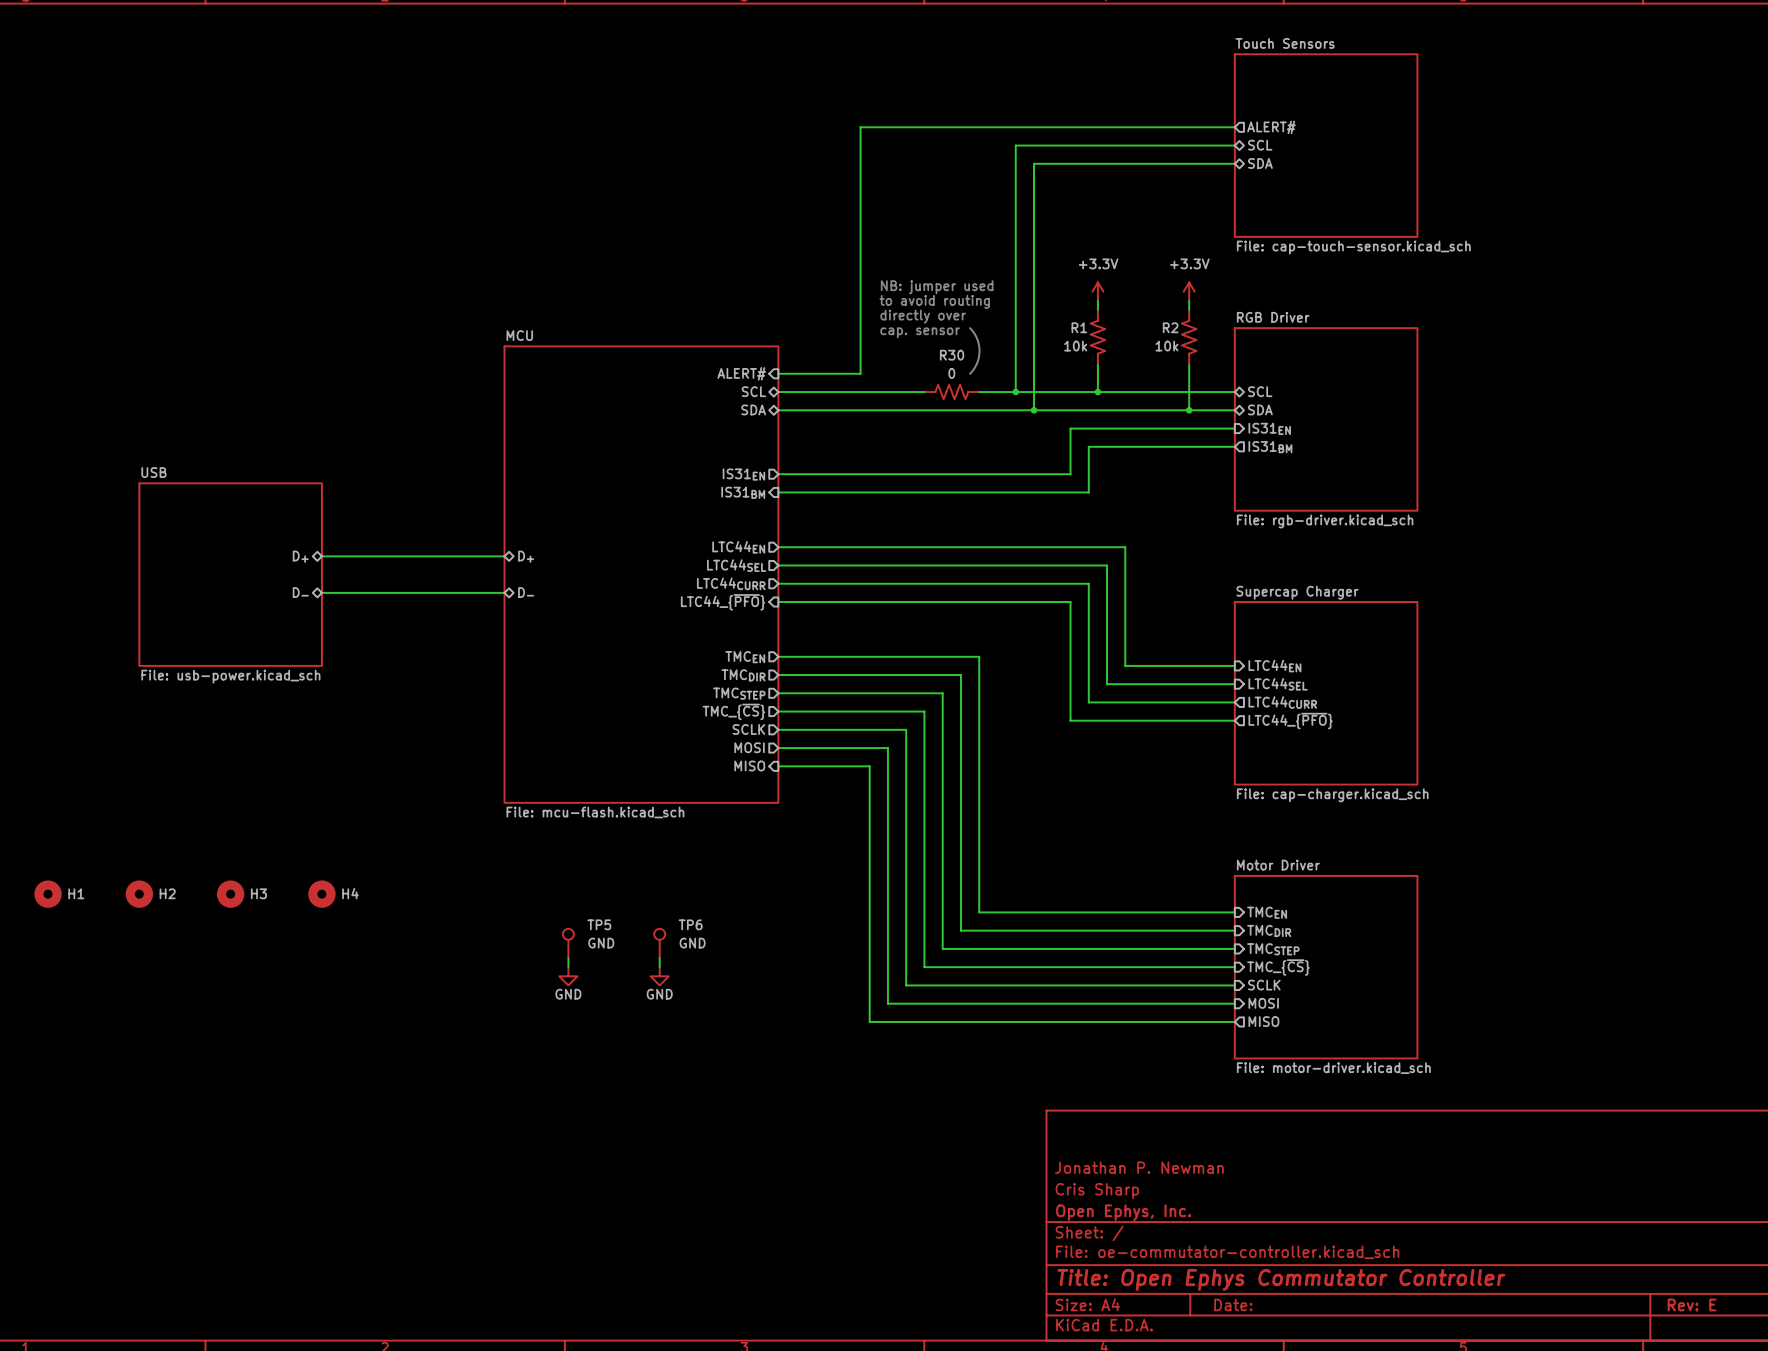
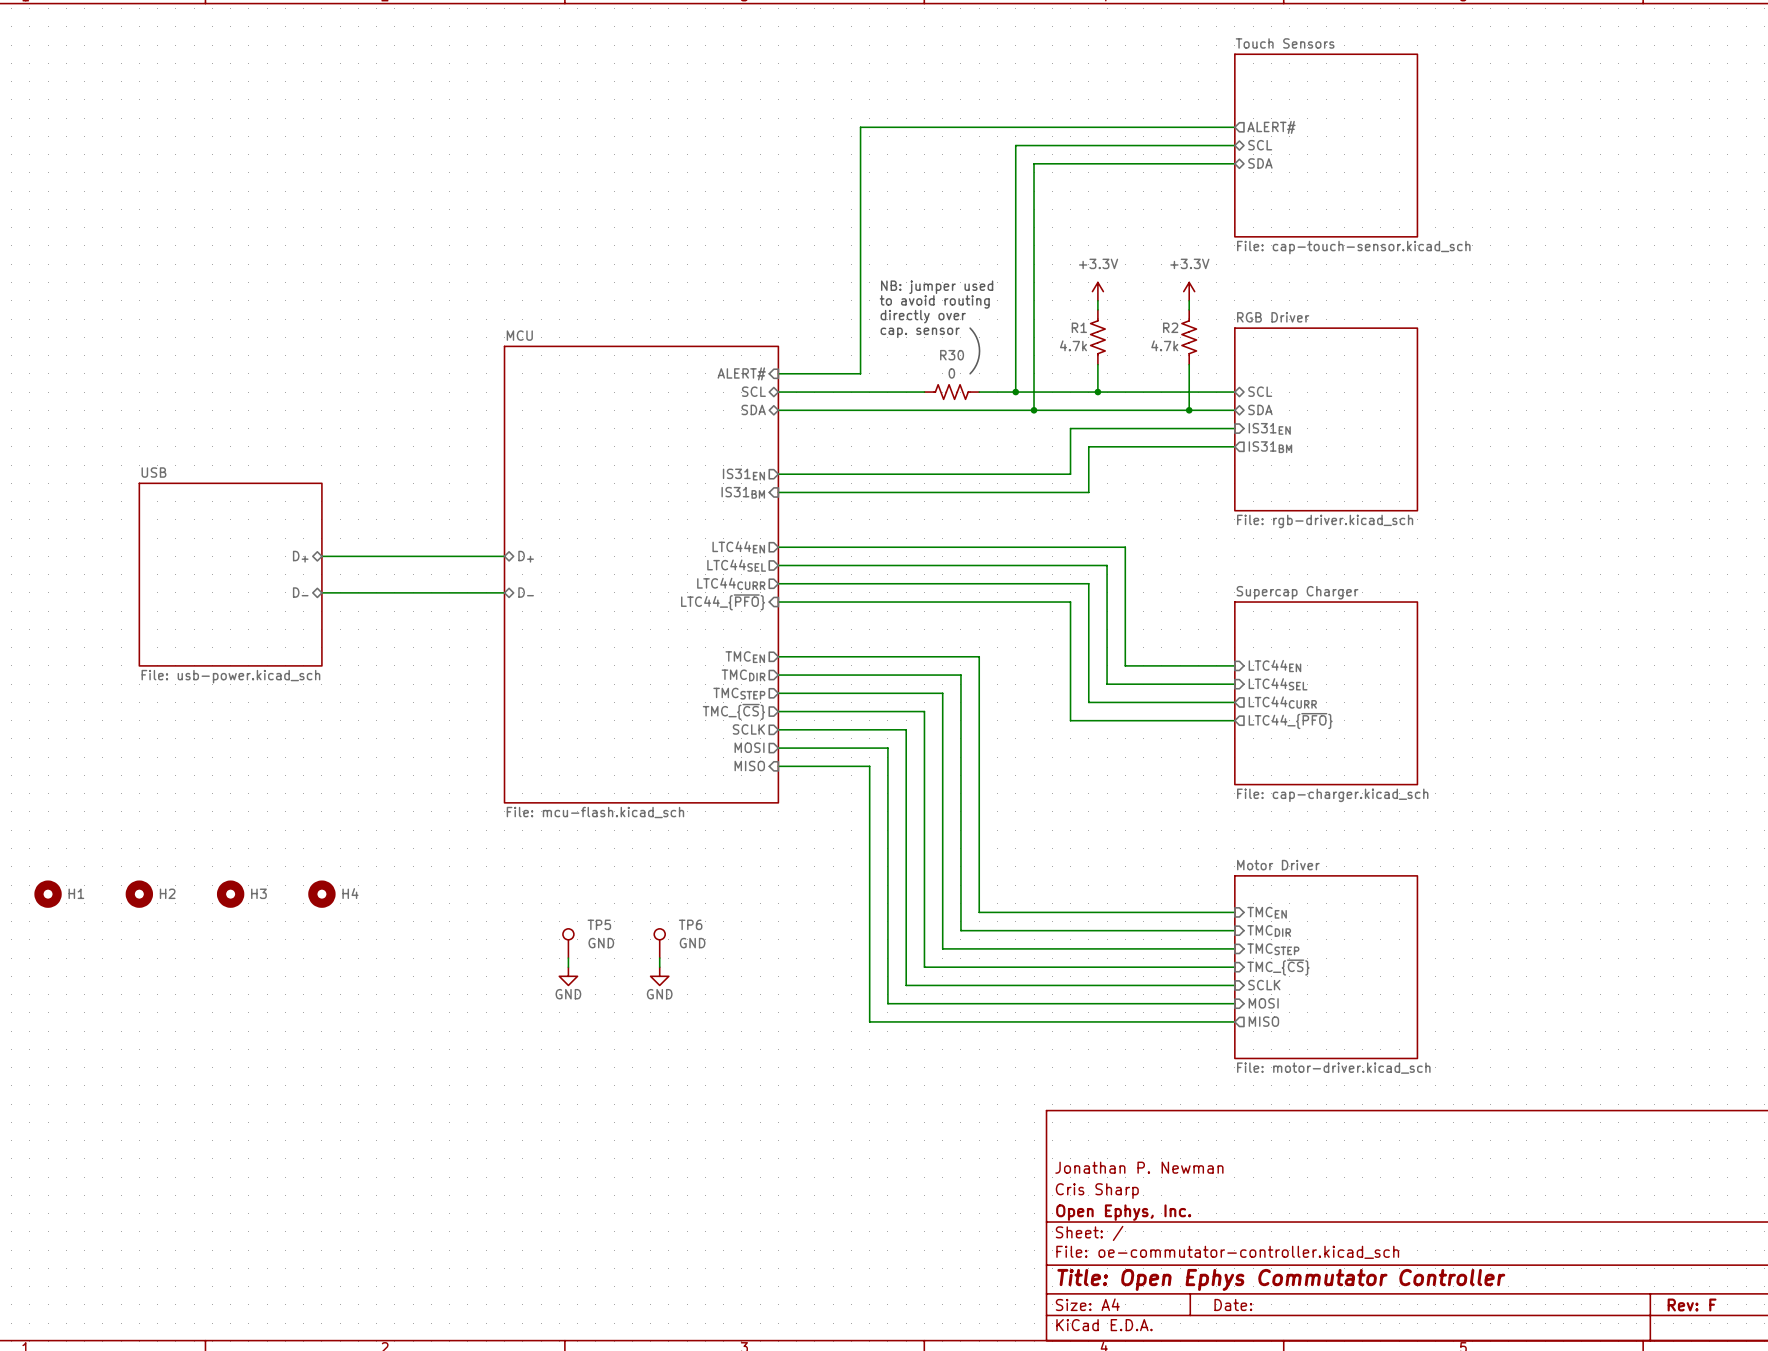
R1 value: 10k (1075, 346) -> 4.7k (1073, 345)
R2 value: 10k (1166, 346) -> 4.7k (1164, 345)
title block: Rev: E (1692, 1304) -> Rev: F (1692, 1304)

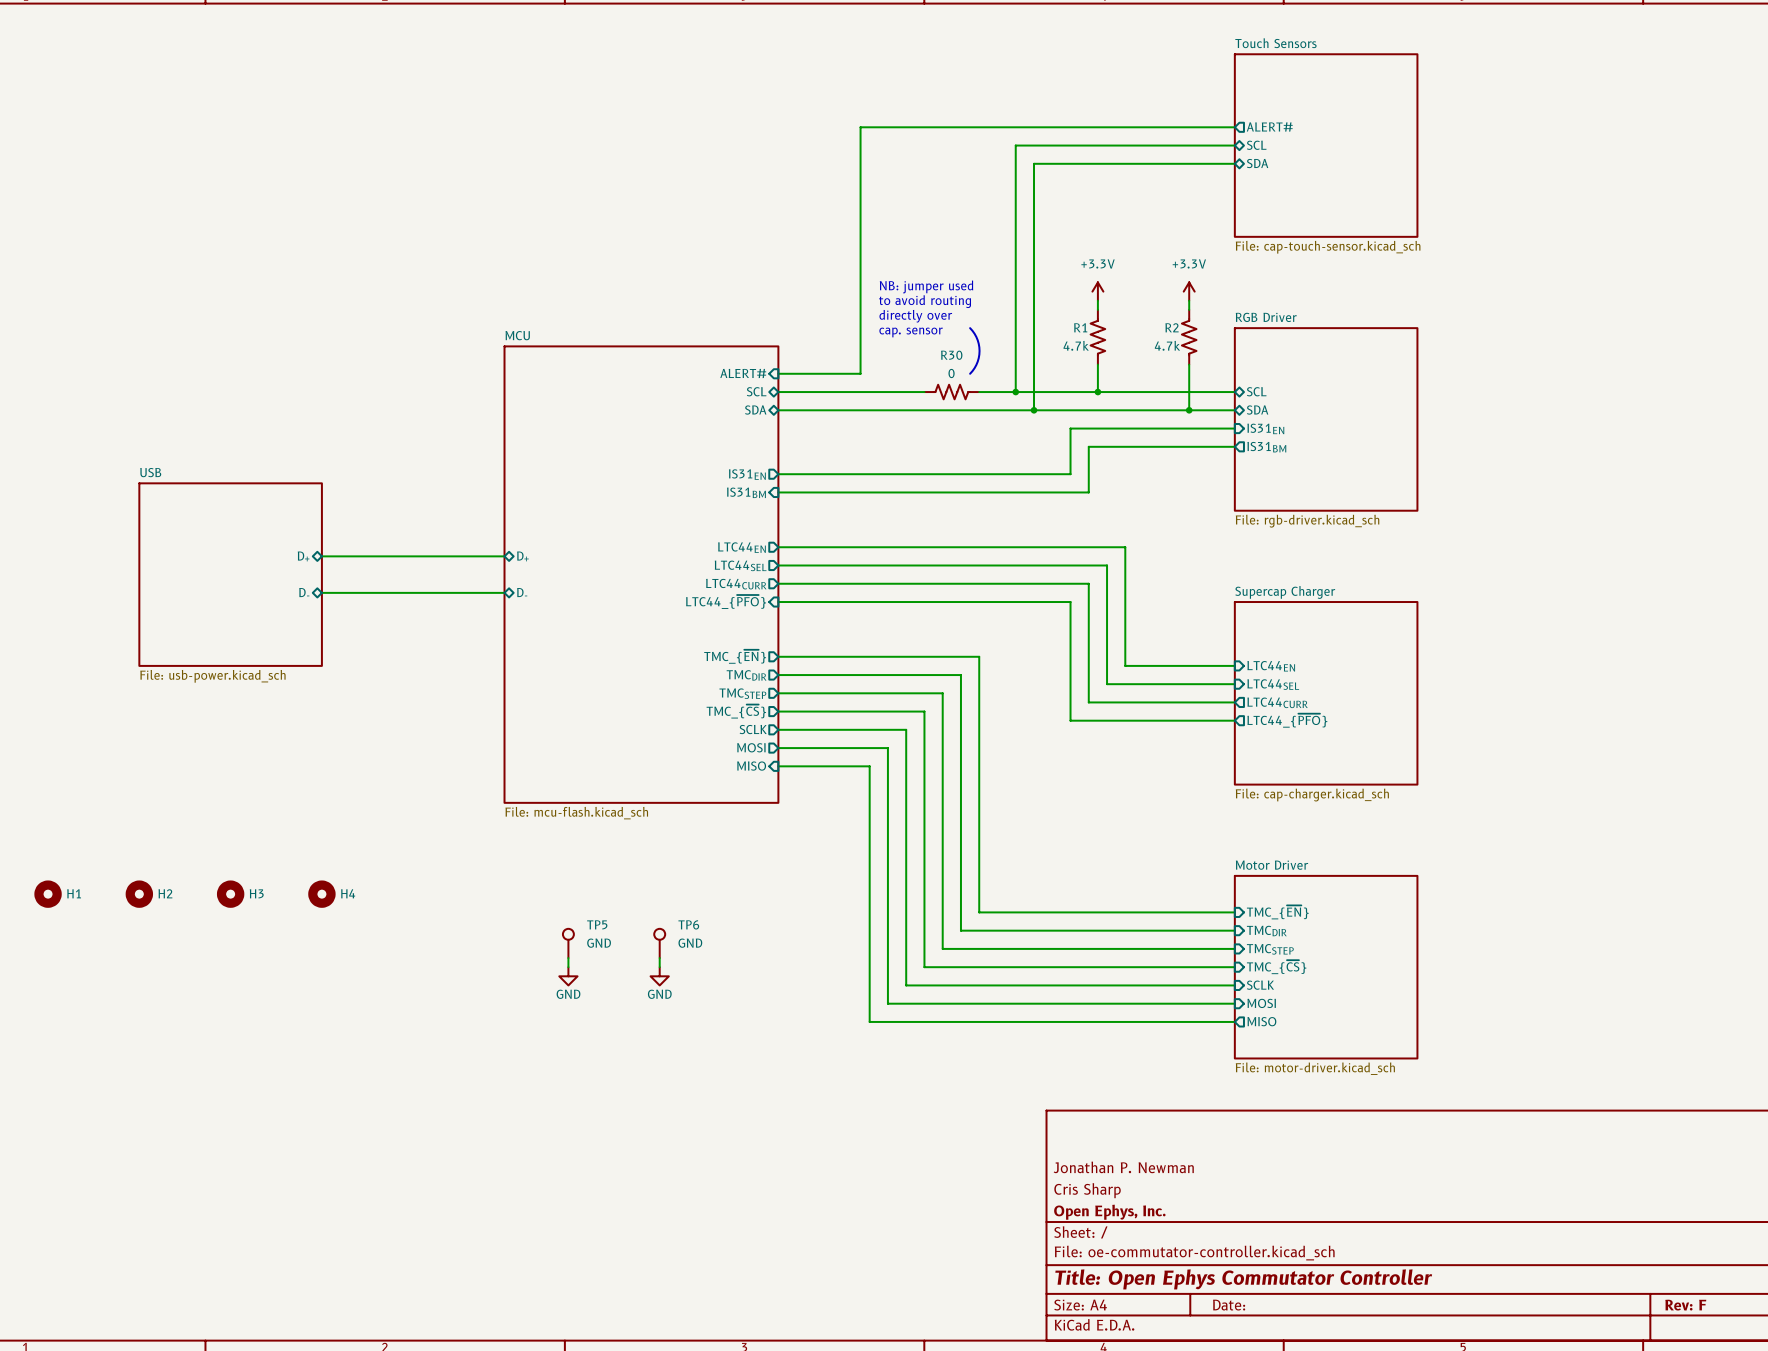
sheet pin: TMCEN (745, 657) -> TMC_{~{EN}} (735, 656)
sheet pin: TMCEN (1267, 912) -> TMC_{~{EN}} (1277, 912)

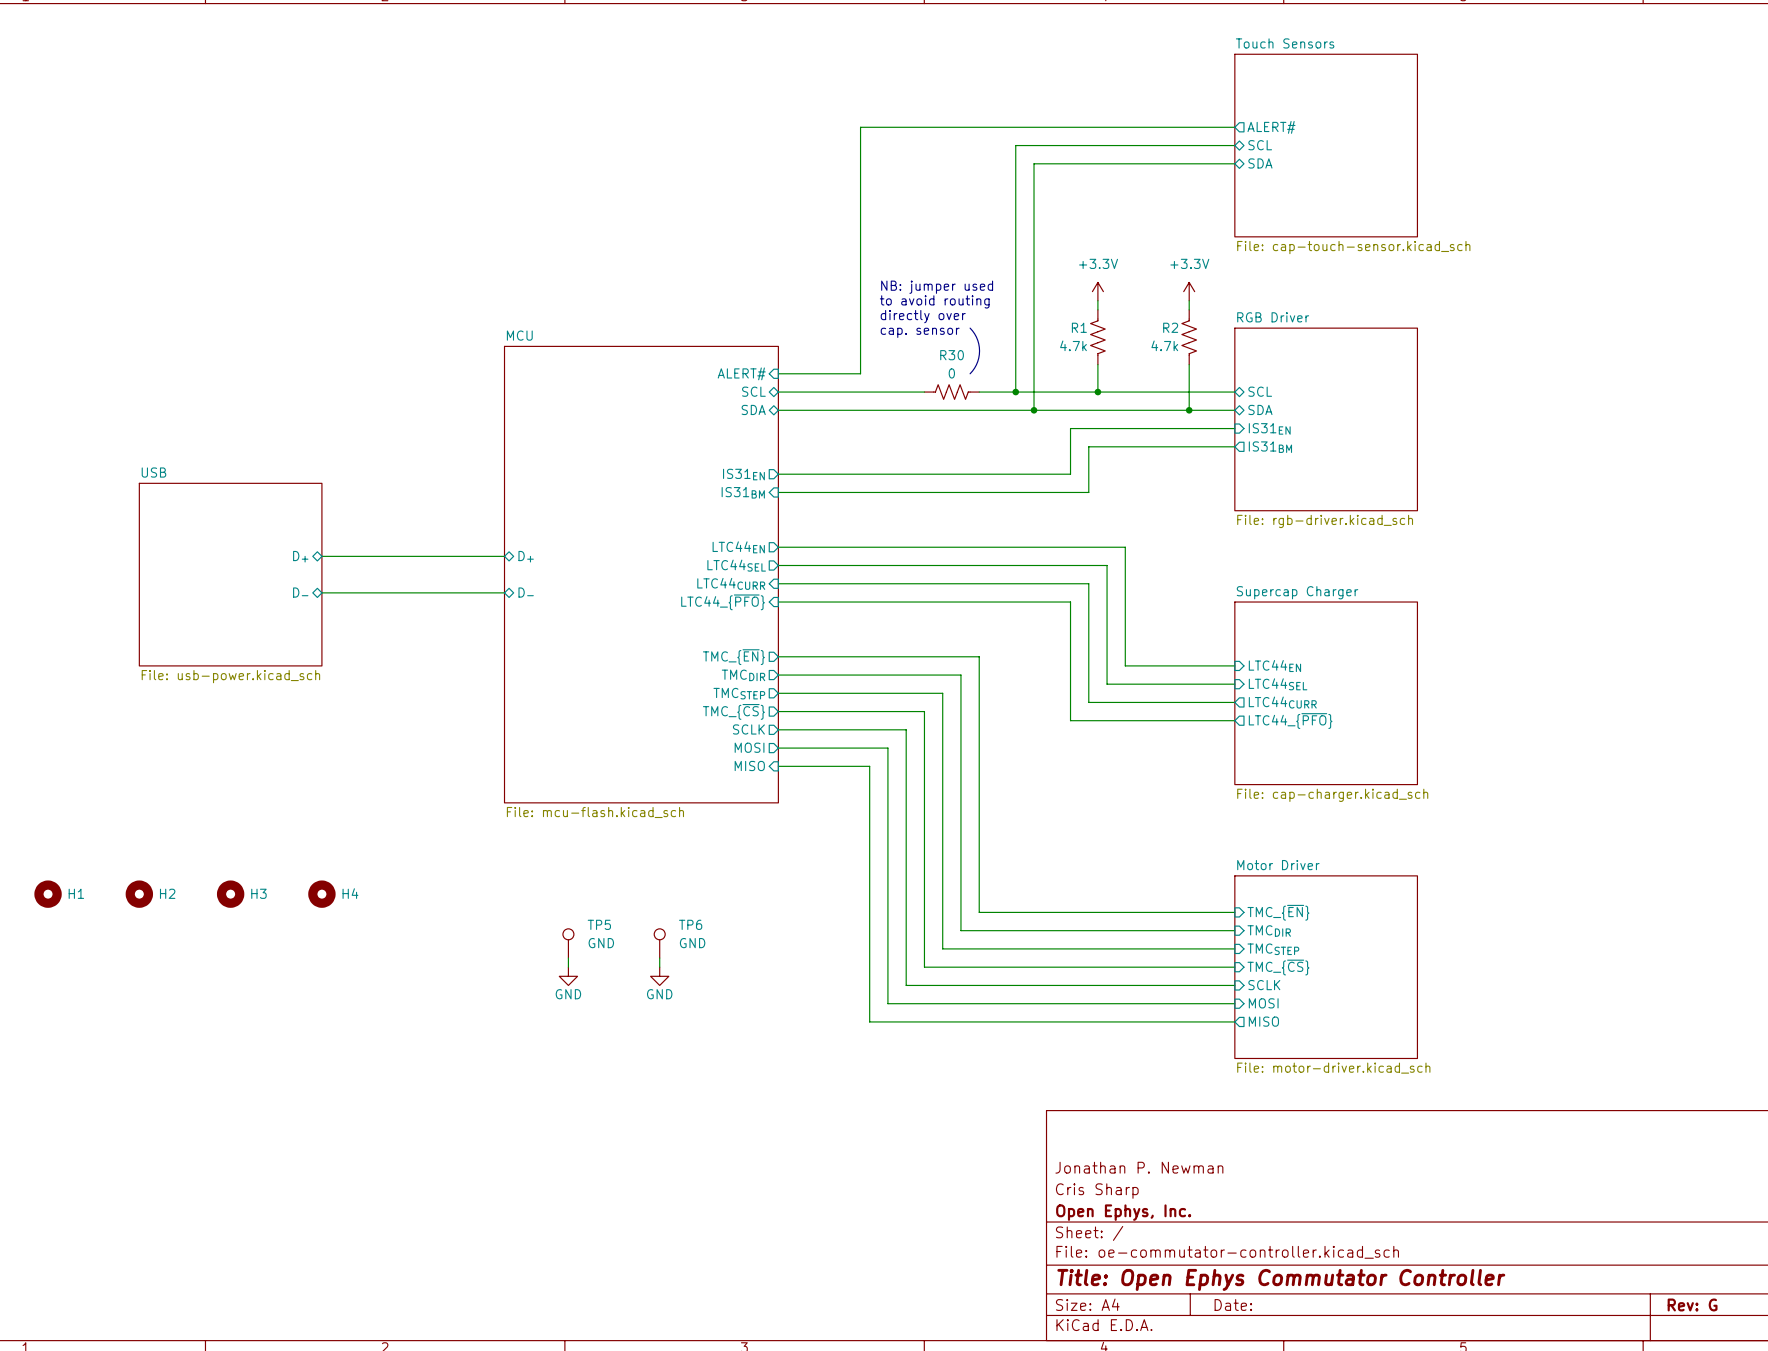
sheet pin shape: output (736, 584) -> input (731, 583)
title block: Rev: F (1685, 1305) -> Rev: G (1692, 1304)

